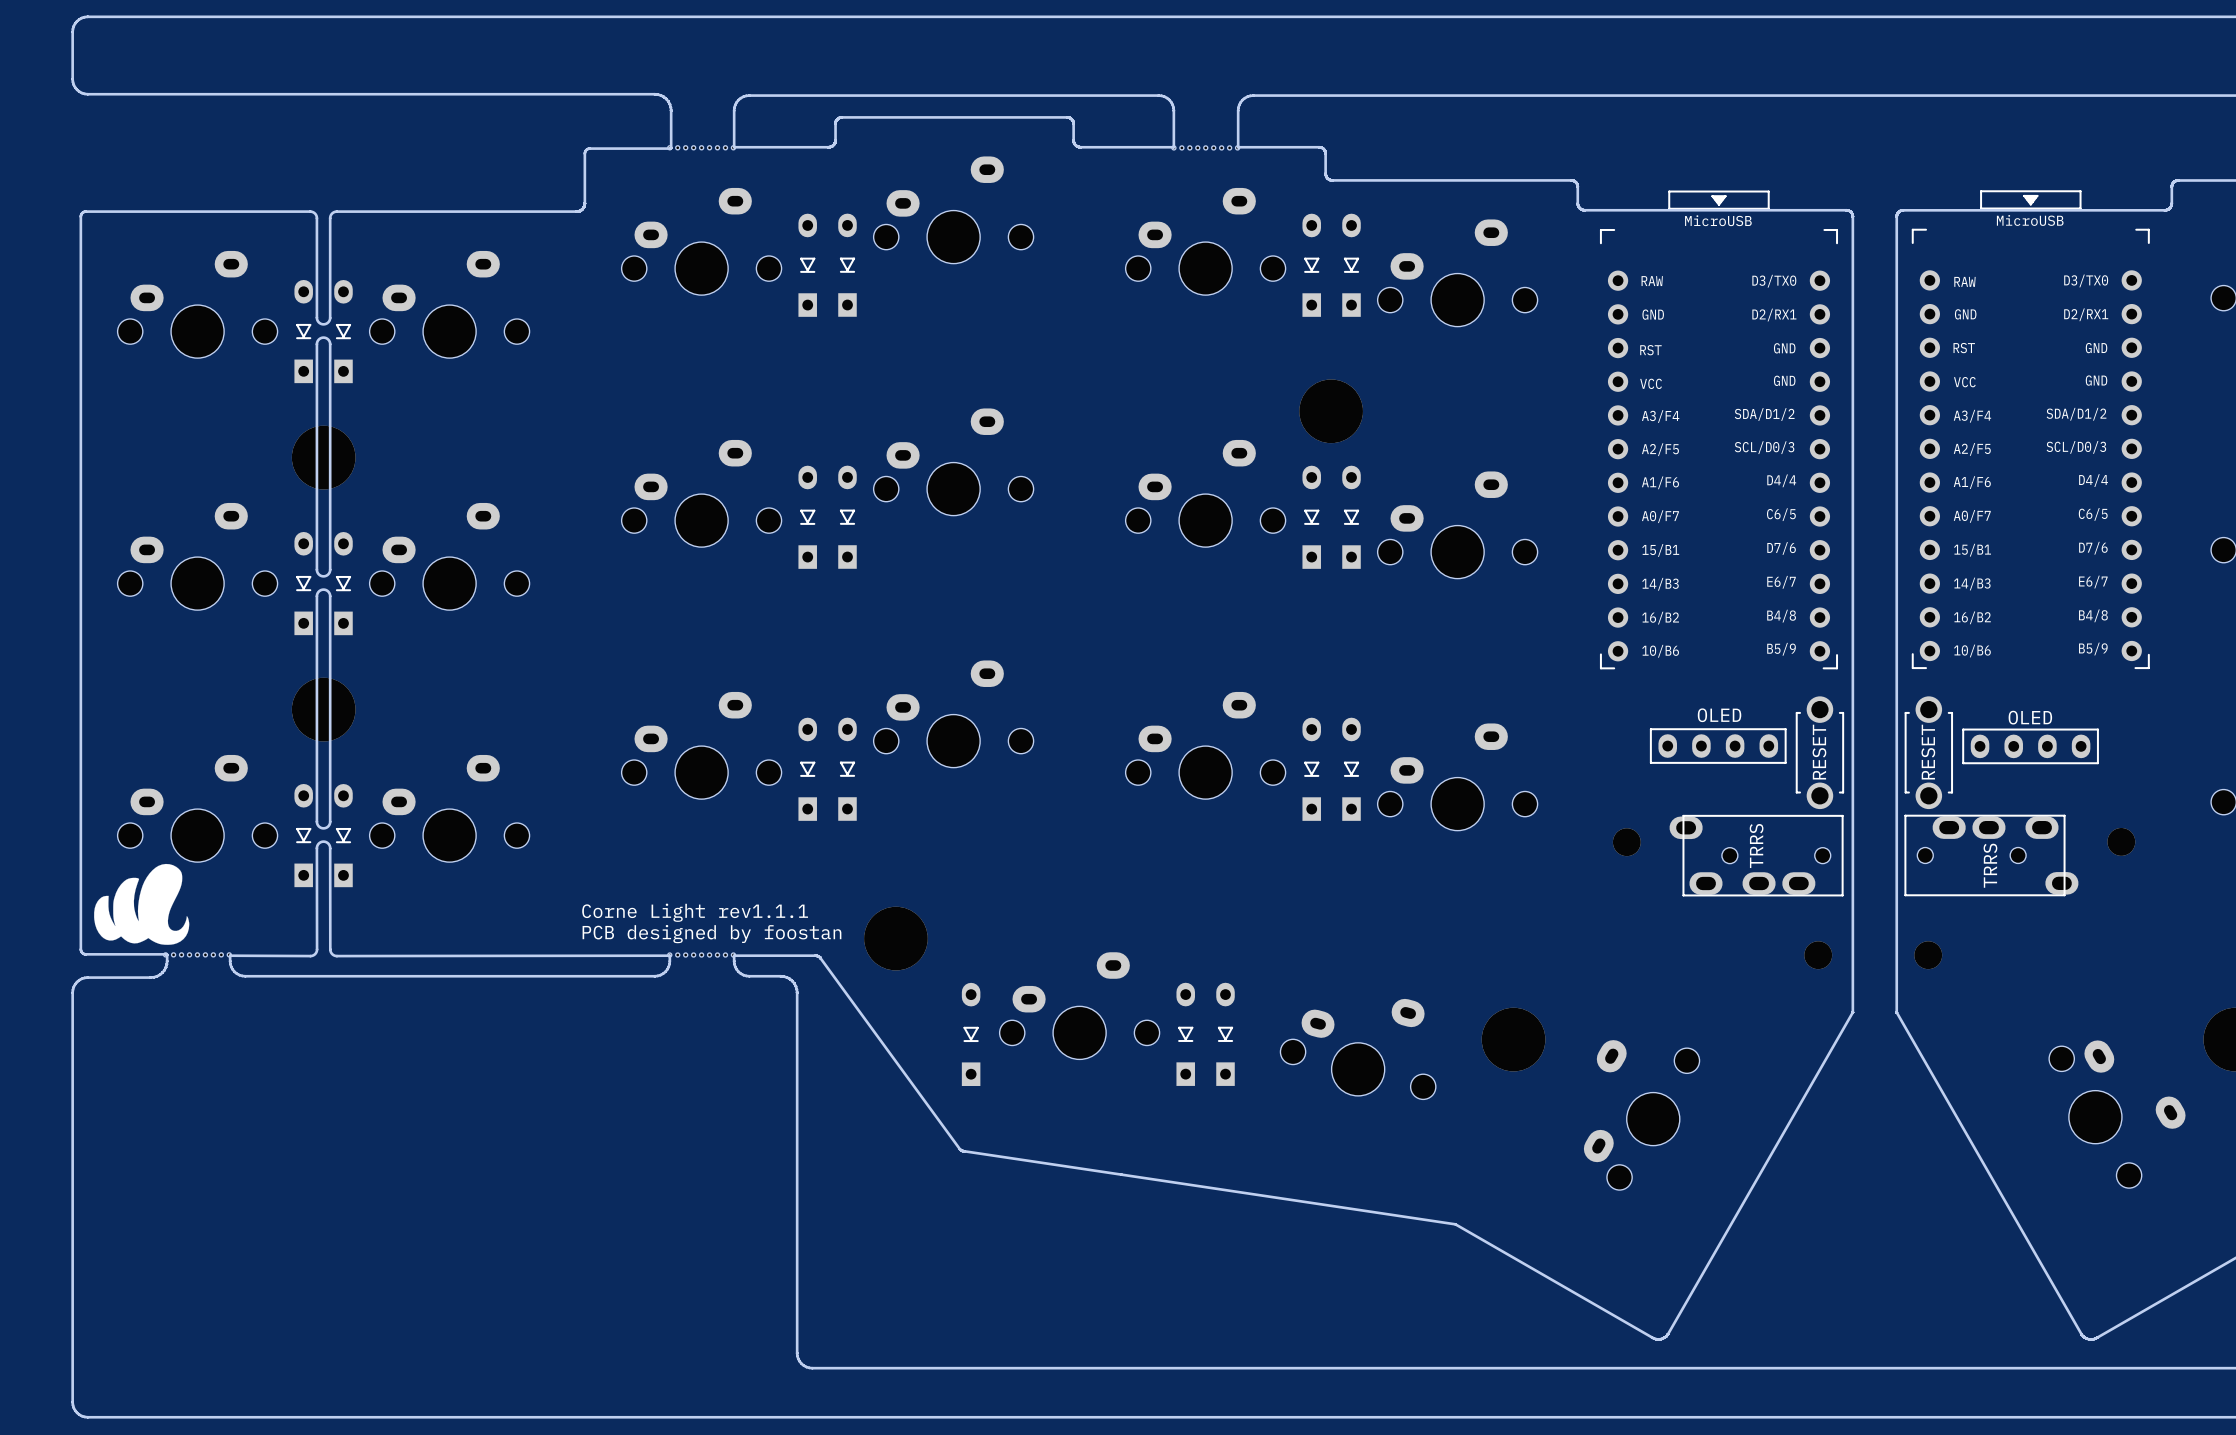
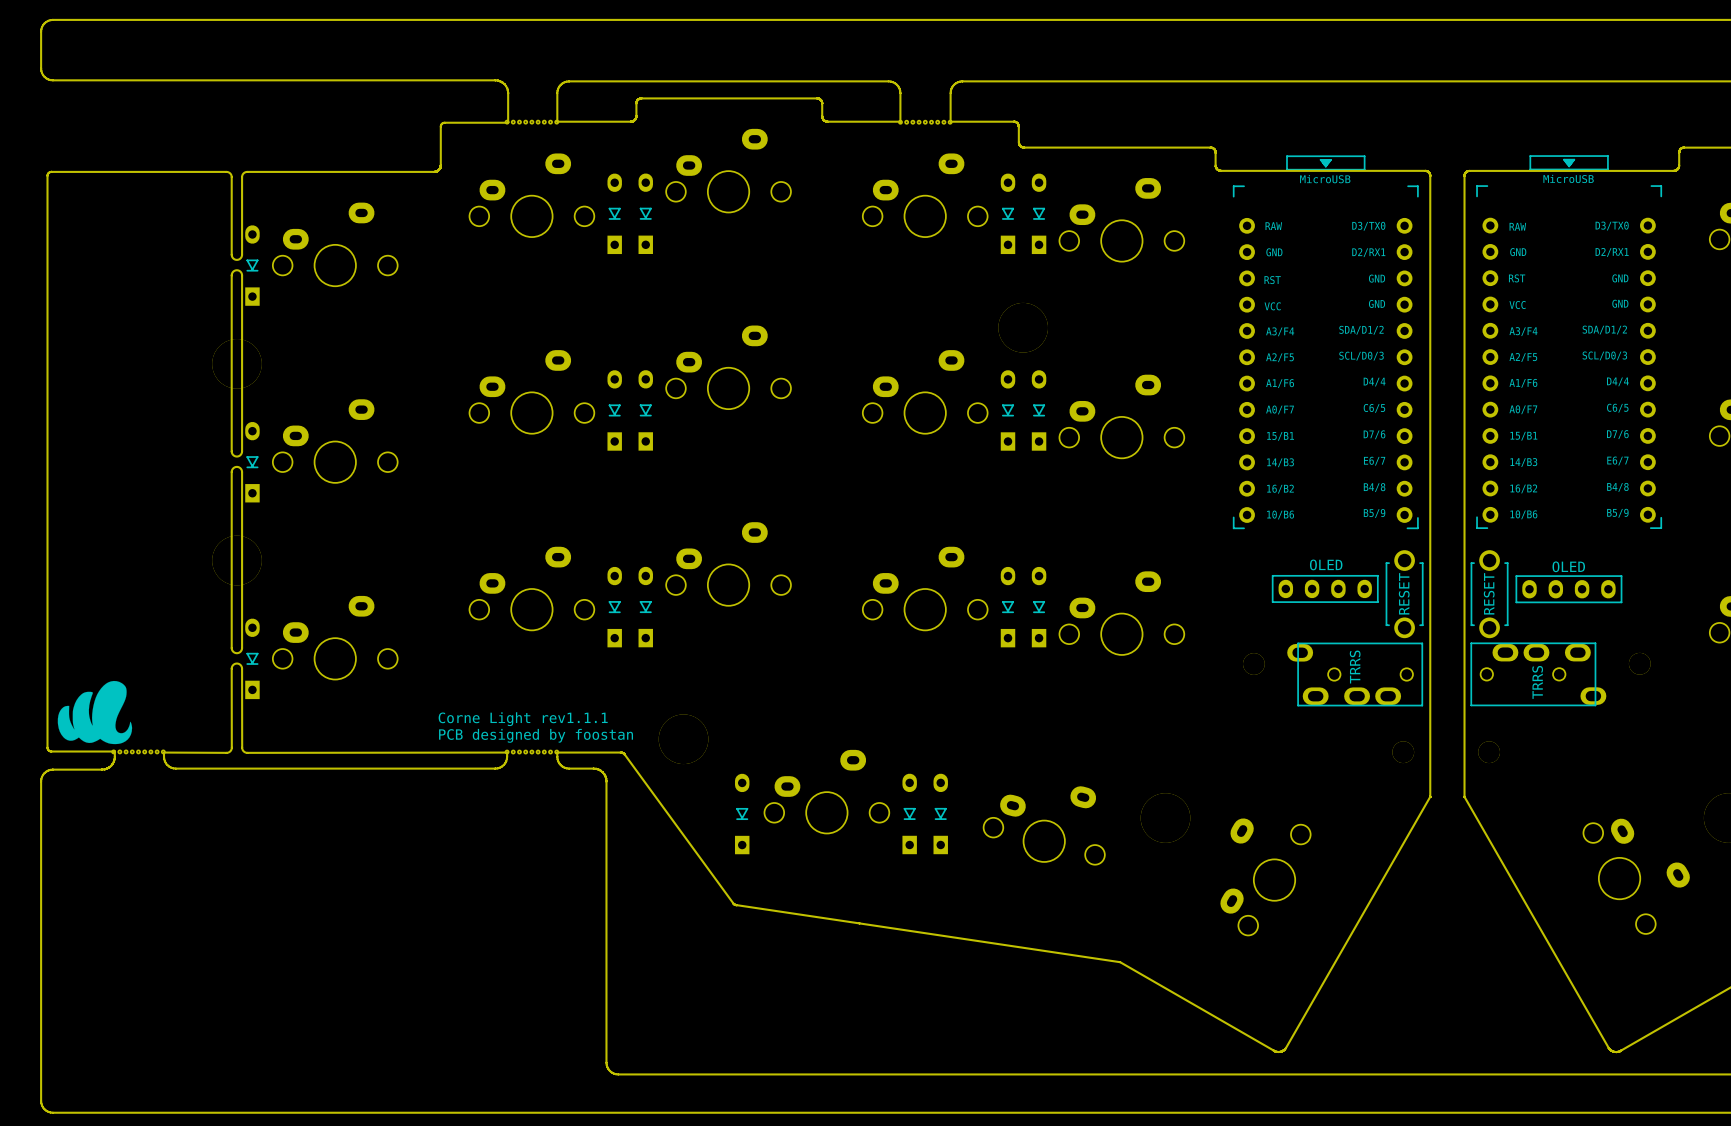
part: (197, 304) -> none
part: (303, 331) -> none
part: (197, 556) -> none
part: (303, 583) -> none
part: (197, 808) -> none
part: (303, 835) -> none

